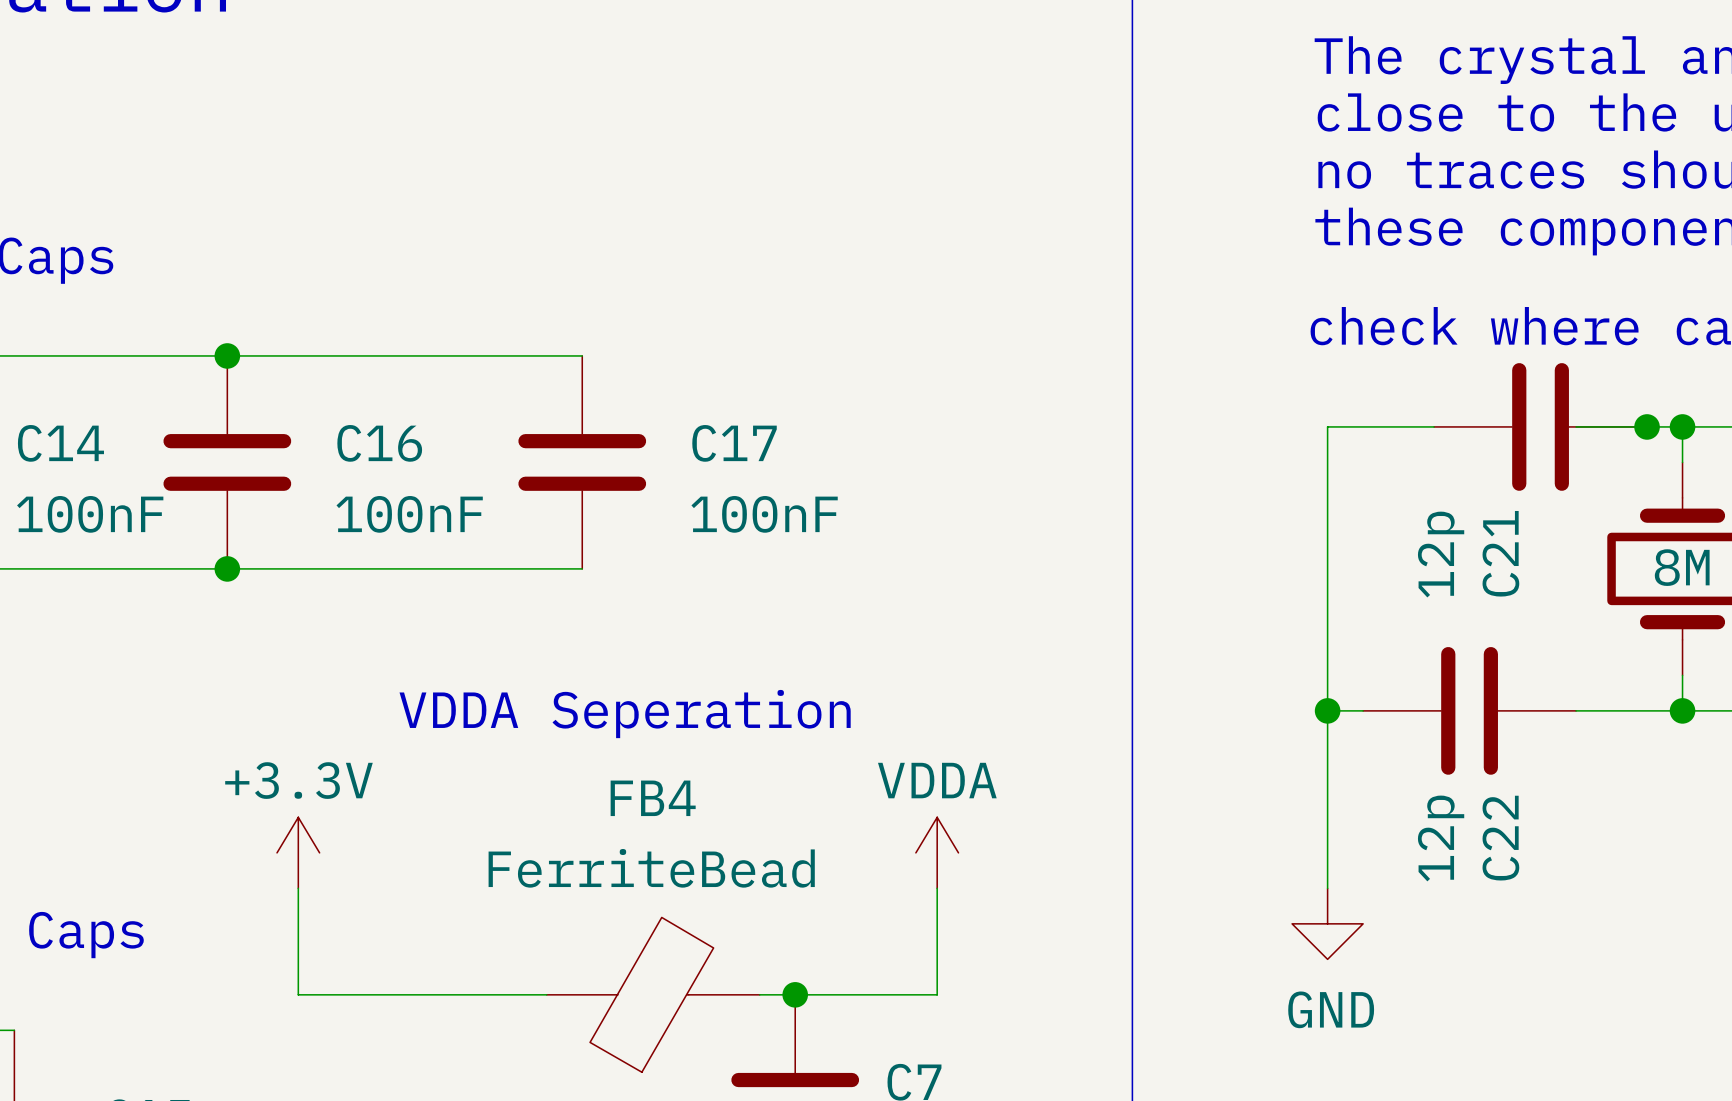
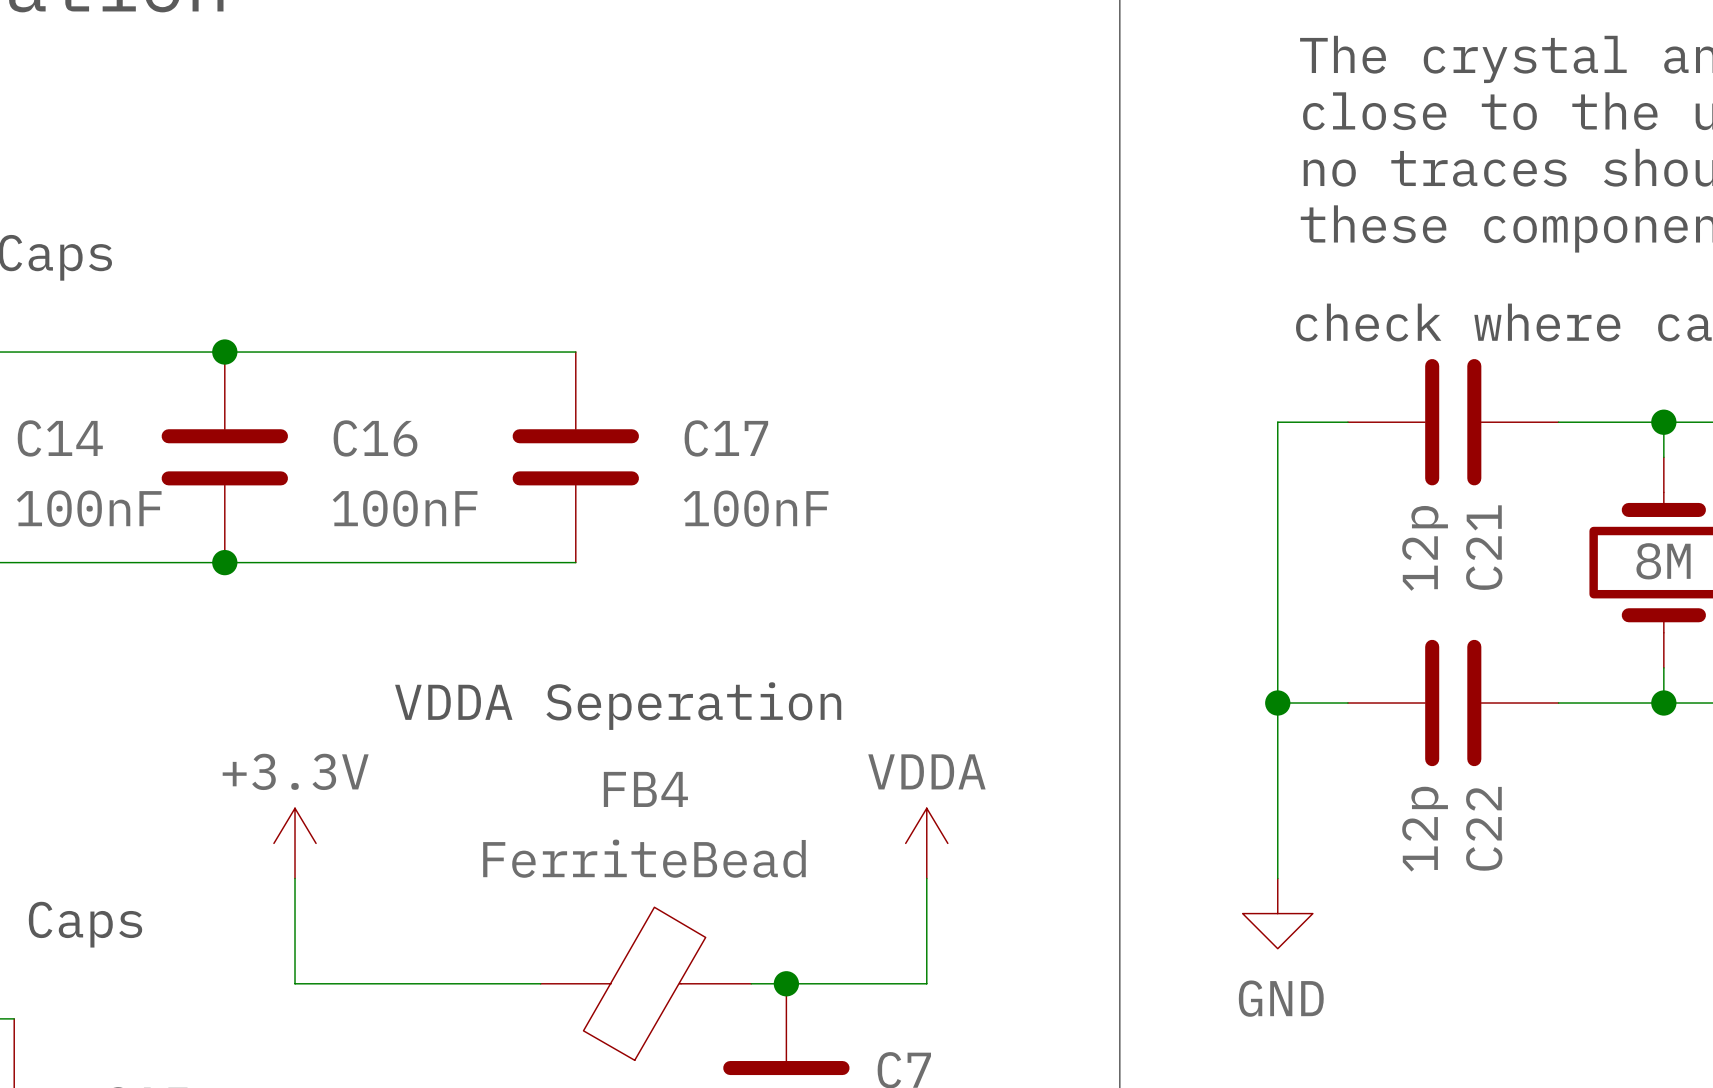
wire: (1327, 426) (1327, 888) -> (1312, 422) (1277, 422) (1277, 878)
C21 position: (1540, 426) -> (1453, 422)
junction: (1647, 426) -> none
wire: none -> (1277, 703) (1312, 703)
junction position: (1327, 710) -> (1277, 703)
power symbol position: GND (1327, 923) -> GND (1277, 913)

